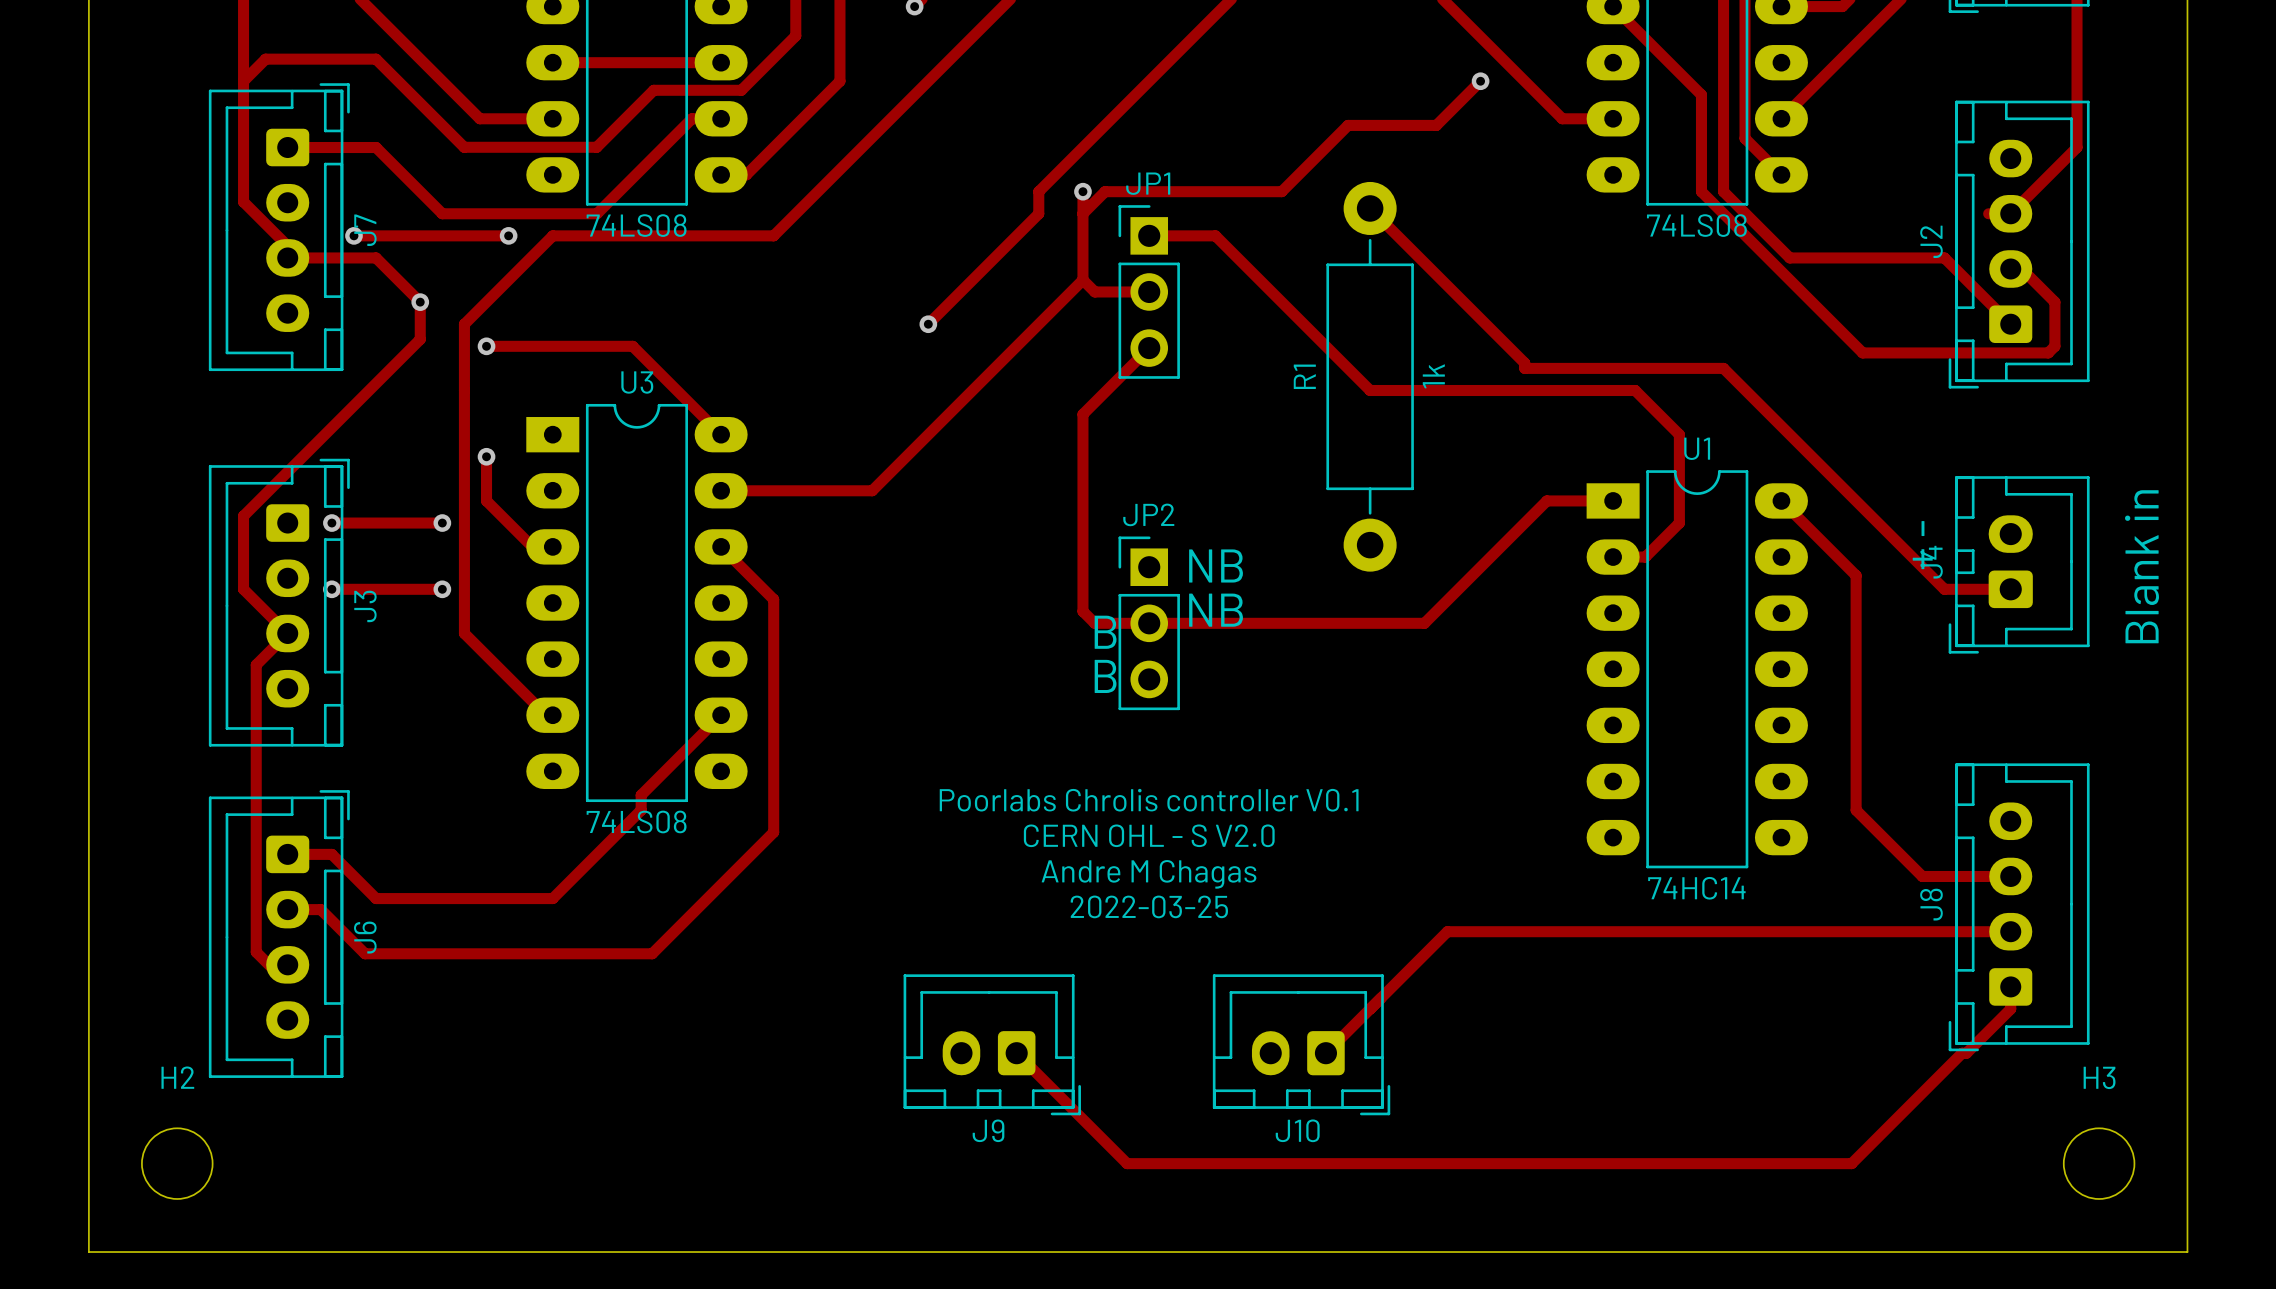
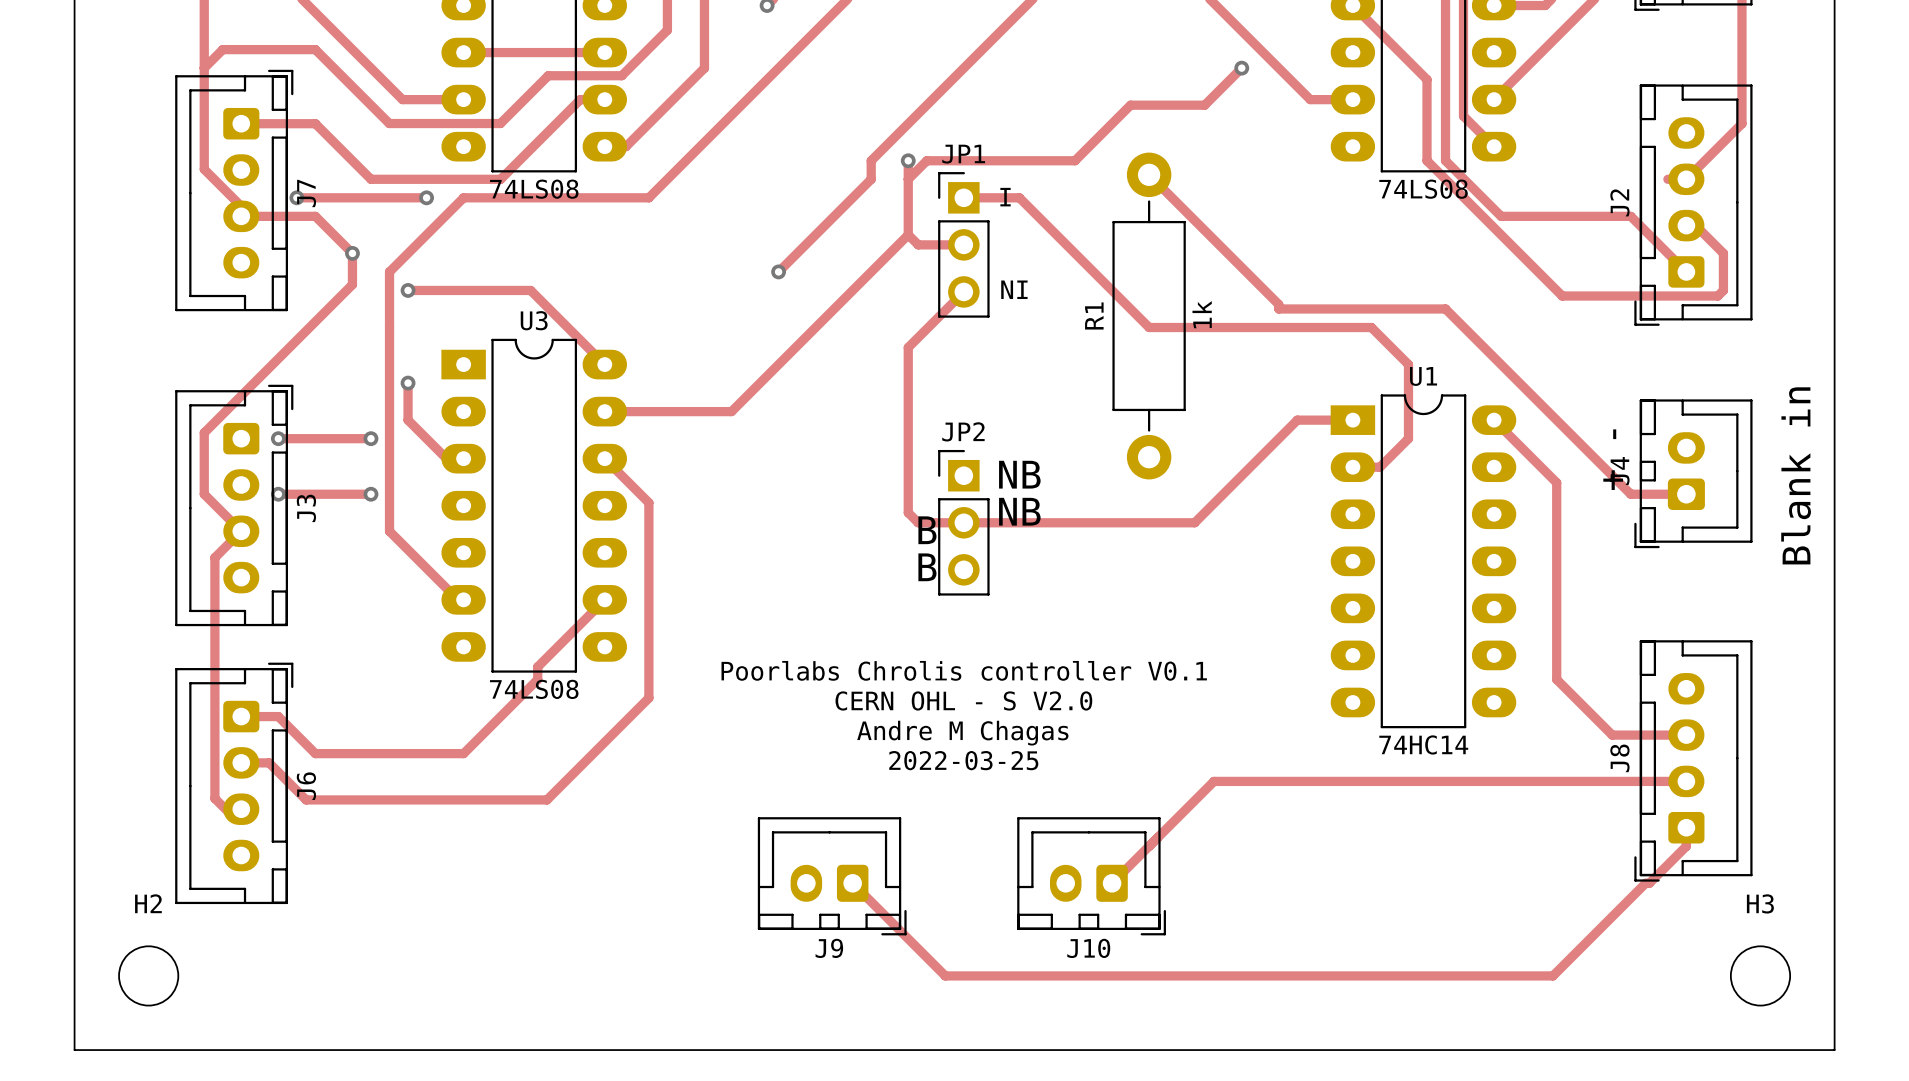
text: none -> I (1005, 197)
text: none -> NI (1014, 289)

